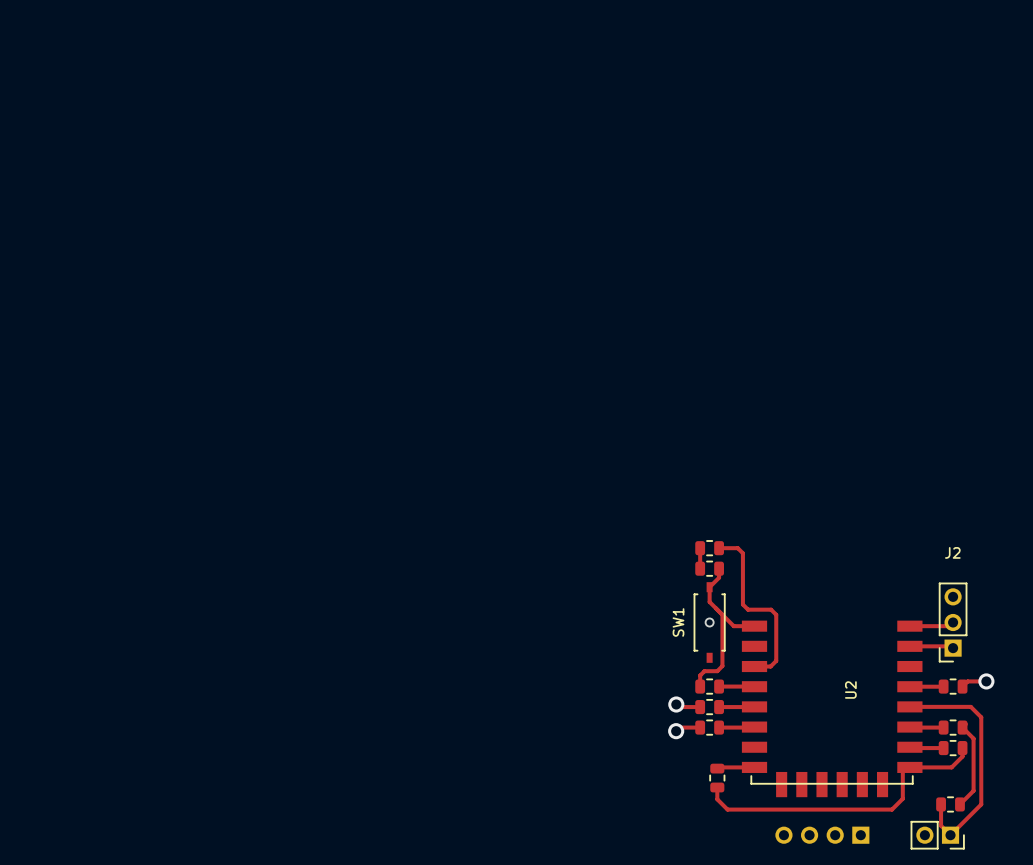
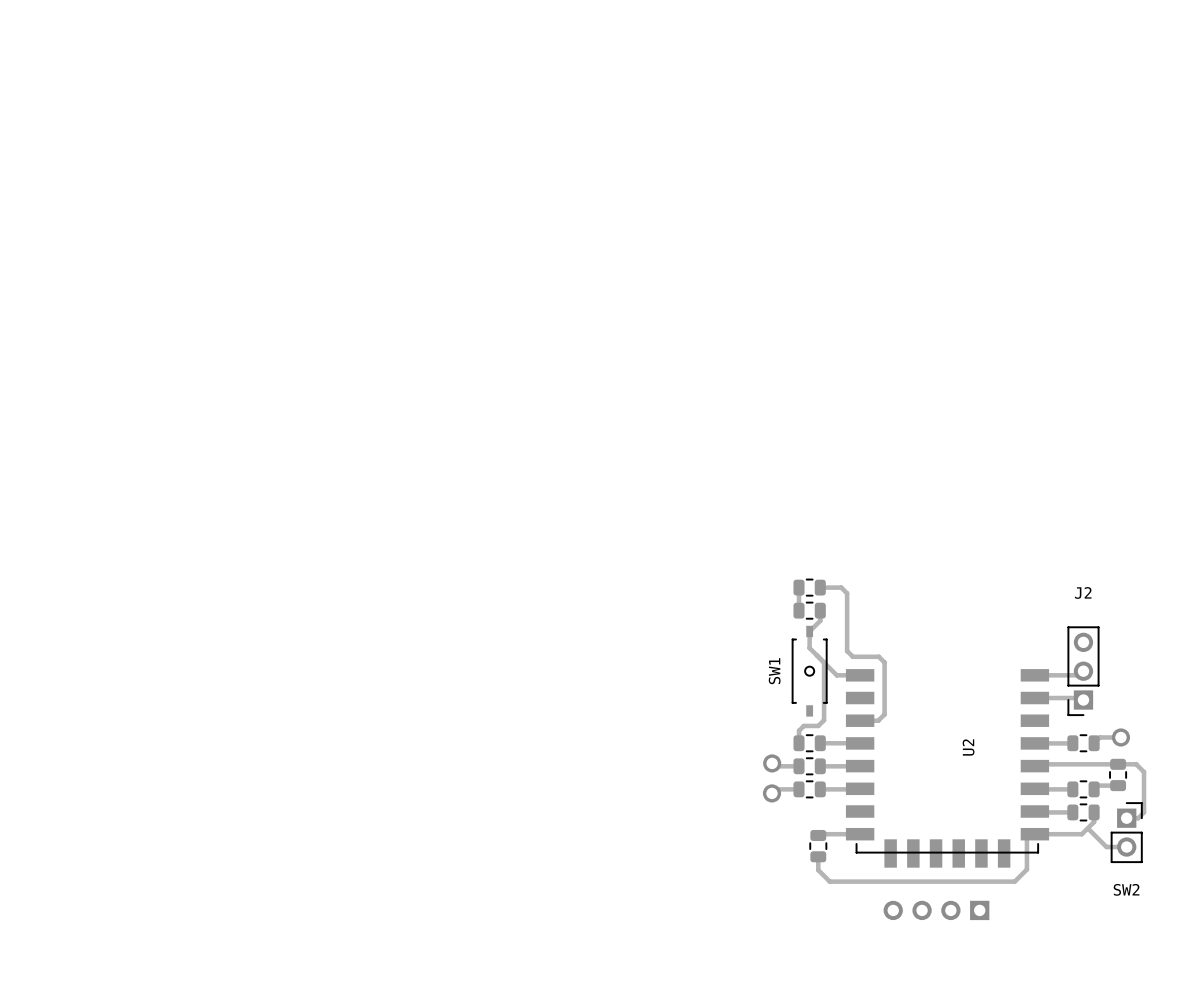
track: none -> (1028, 764) (1136, 764) (1144, 772) (1144, 812) (1138, 818) (1126, 818)
track: (902, 706) (970, 706) (981, 717) (981, 804) (950, 835) (941, 825) (941, 804) -> none
track: none -> (1097, 785) (1118, 785)
track: (962, 727) (973, 738) (973, 790) (959, 804) -> none
track: none -> (1089, 829) (1106, 847) (1126, 847)
SW2: none -> (1126, 832)
part rotation: 0° (950, 804) -> 90° clockwise (1118, 774)
part position: (950, 804) -> (1118, 774)
part: (937, 835) -> none

